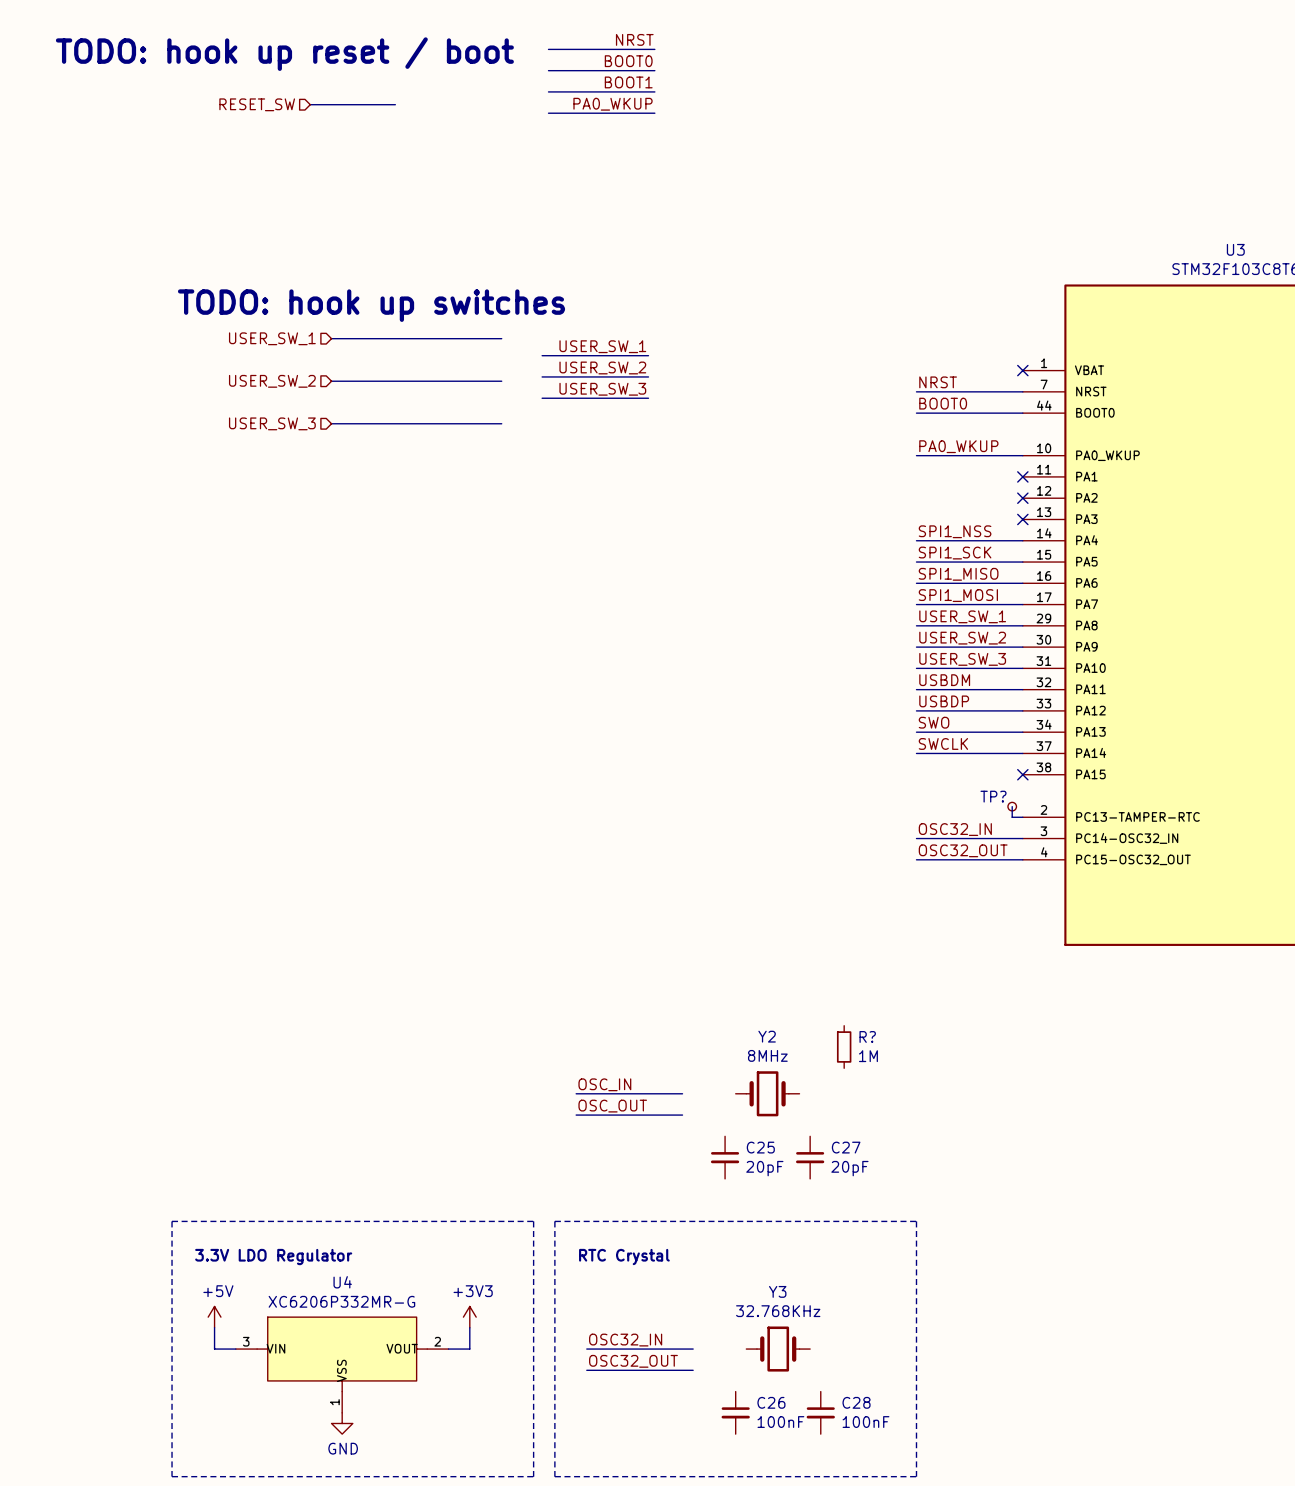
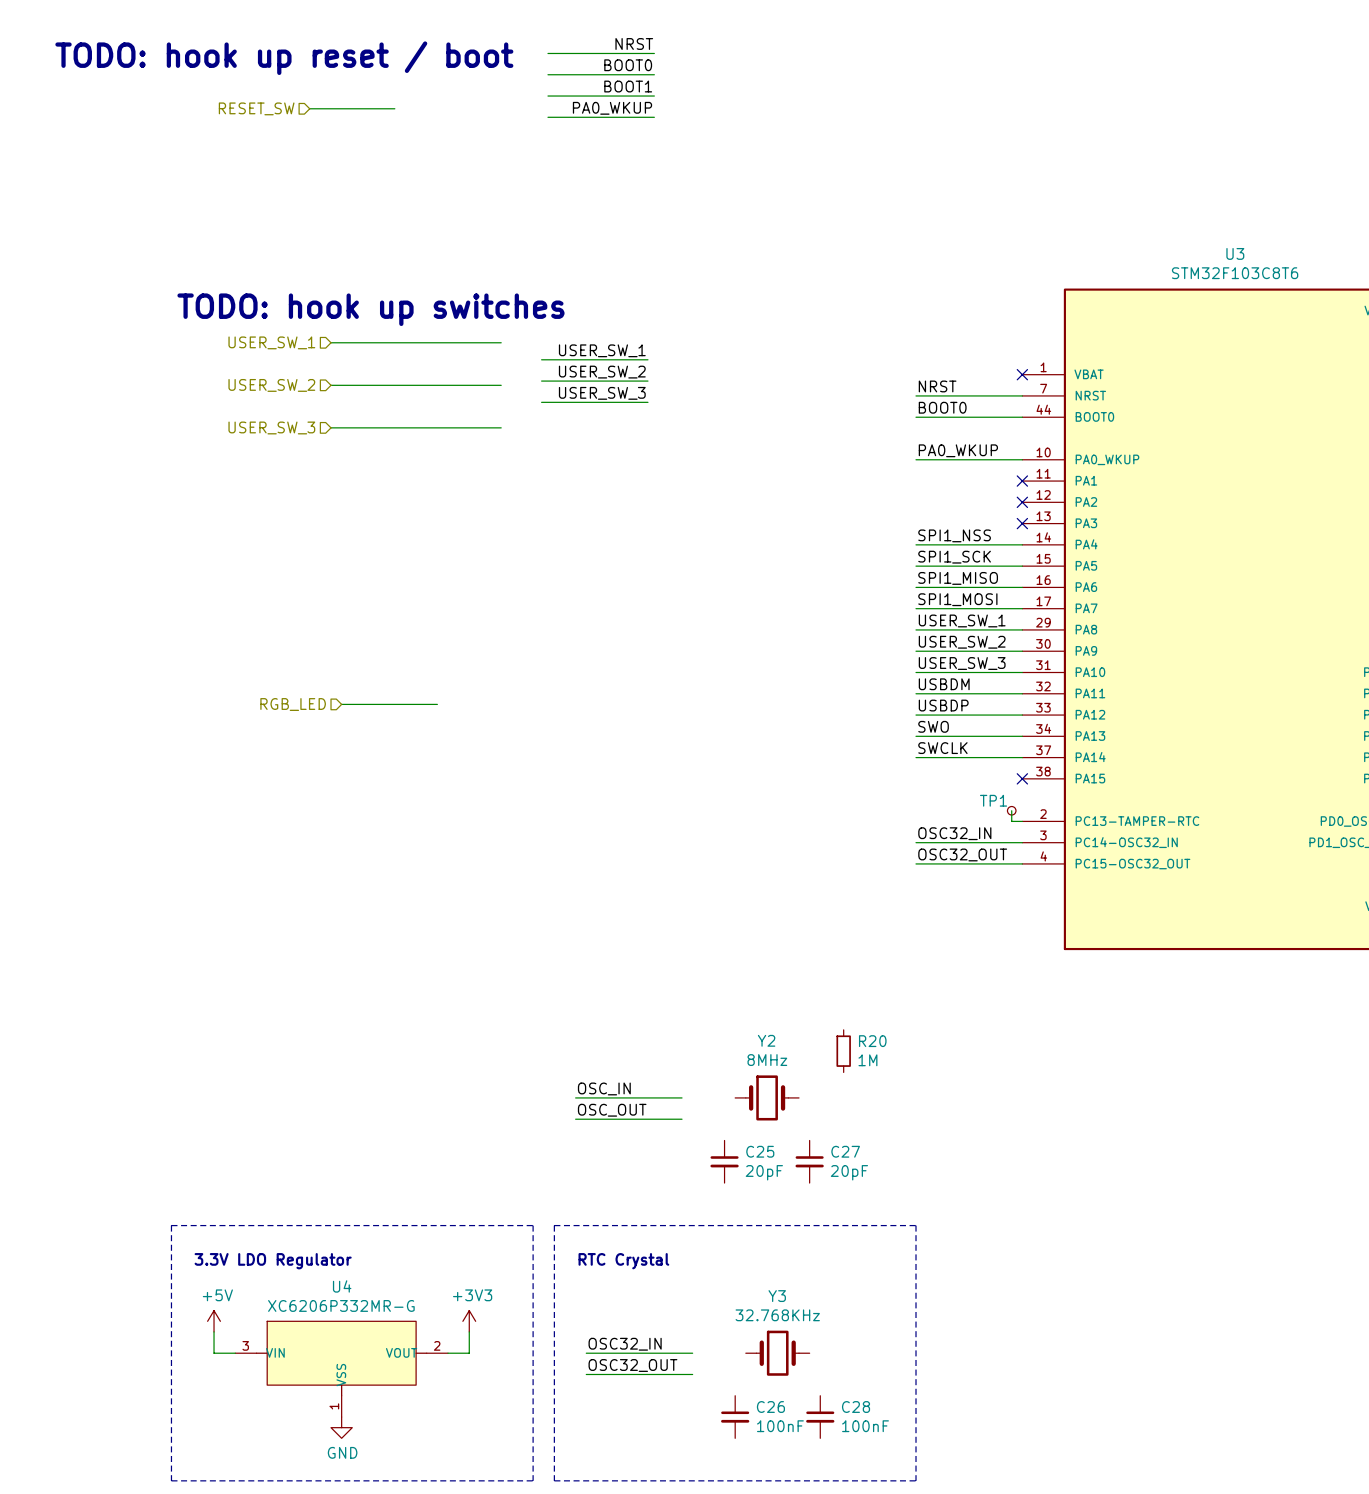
hierarchical label: none -> RGB_LED (293, 704)
wire: none -> (341, 704) (437, 704)
TP? name: TP? (993, 796) -> TP1 (993, 800)
R? name: R? (867, 1036) -> R20 (872, 1041)

